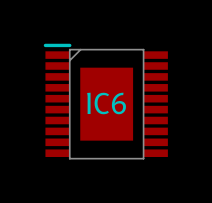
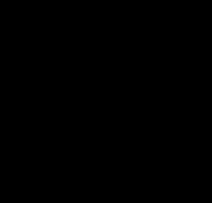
IC6: (105, 101) -> none

